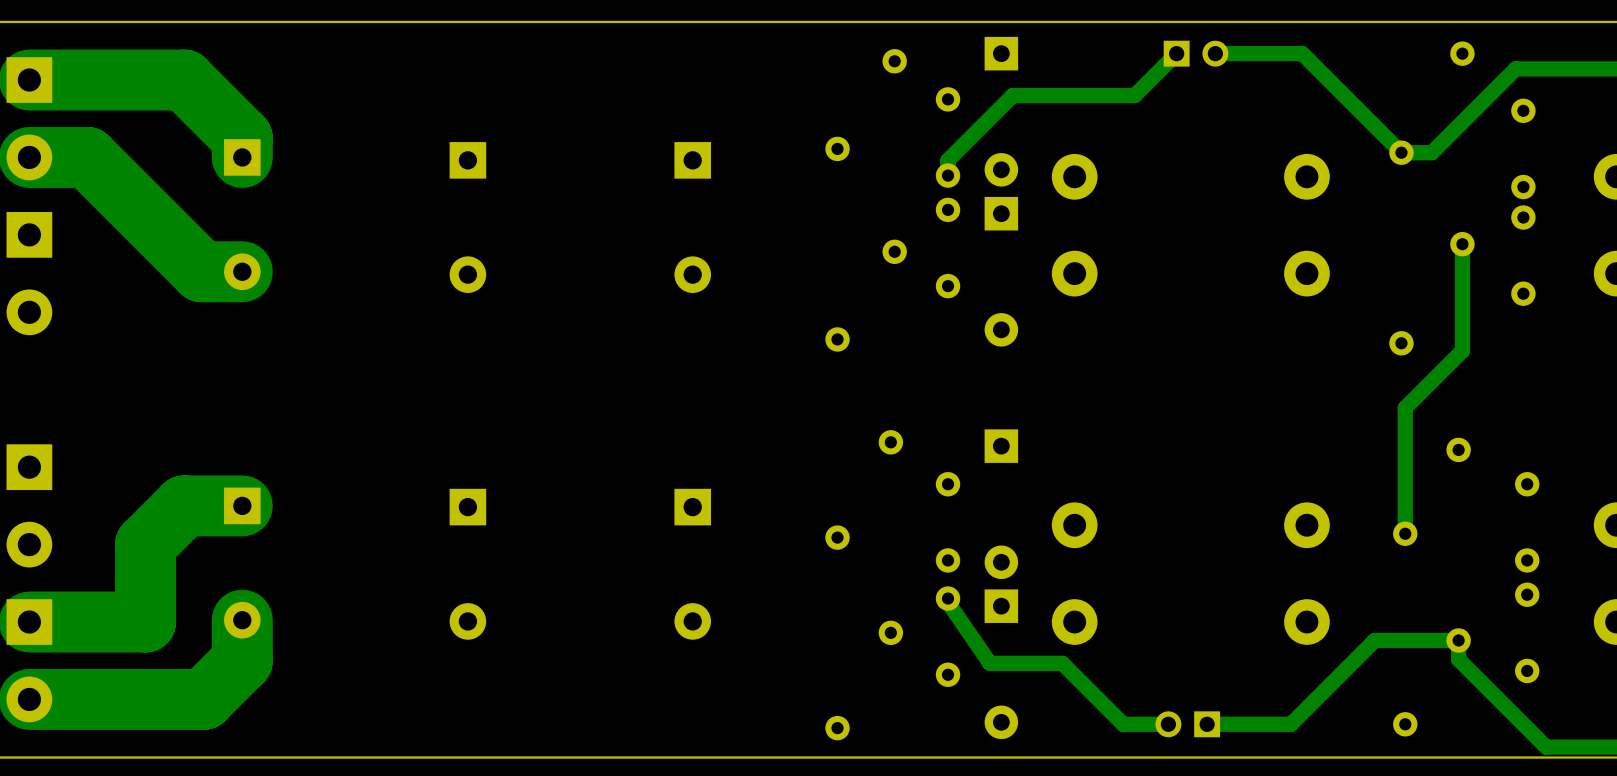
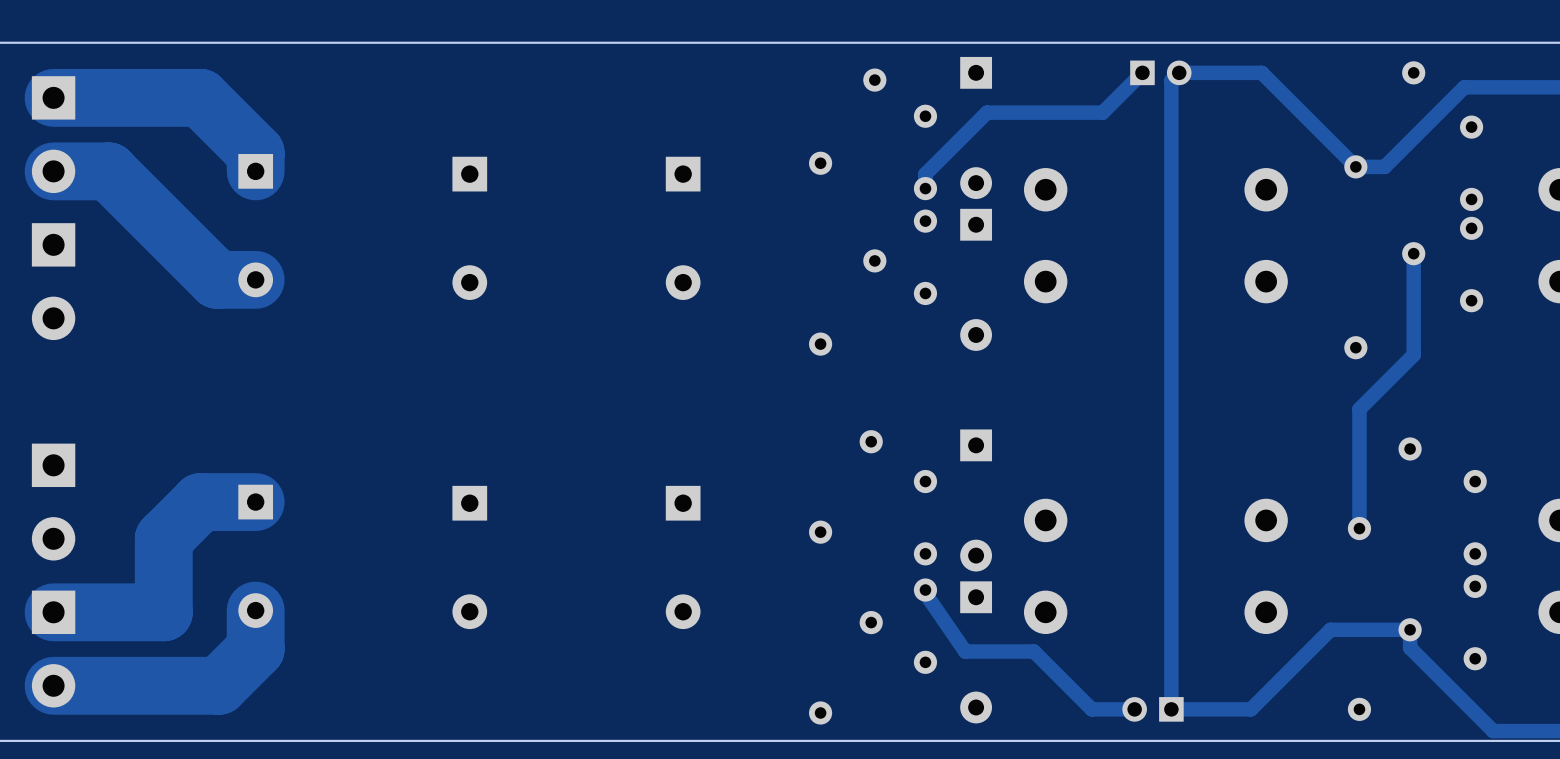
track: none -> (1179, 72) (1171, 80) (1171, 709)

